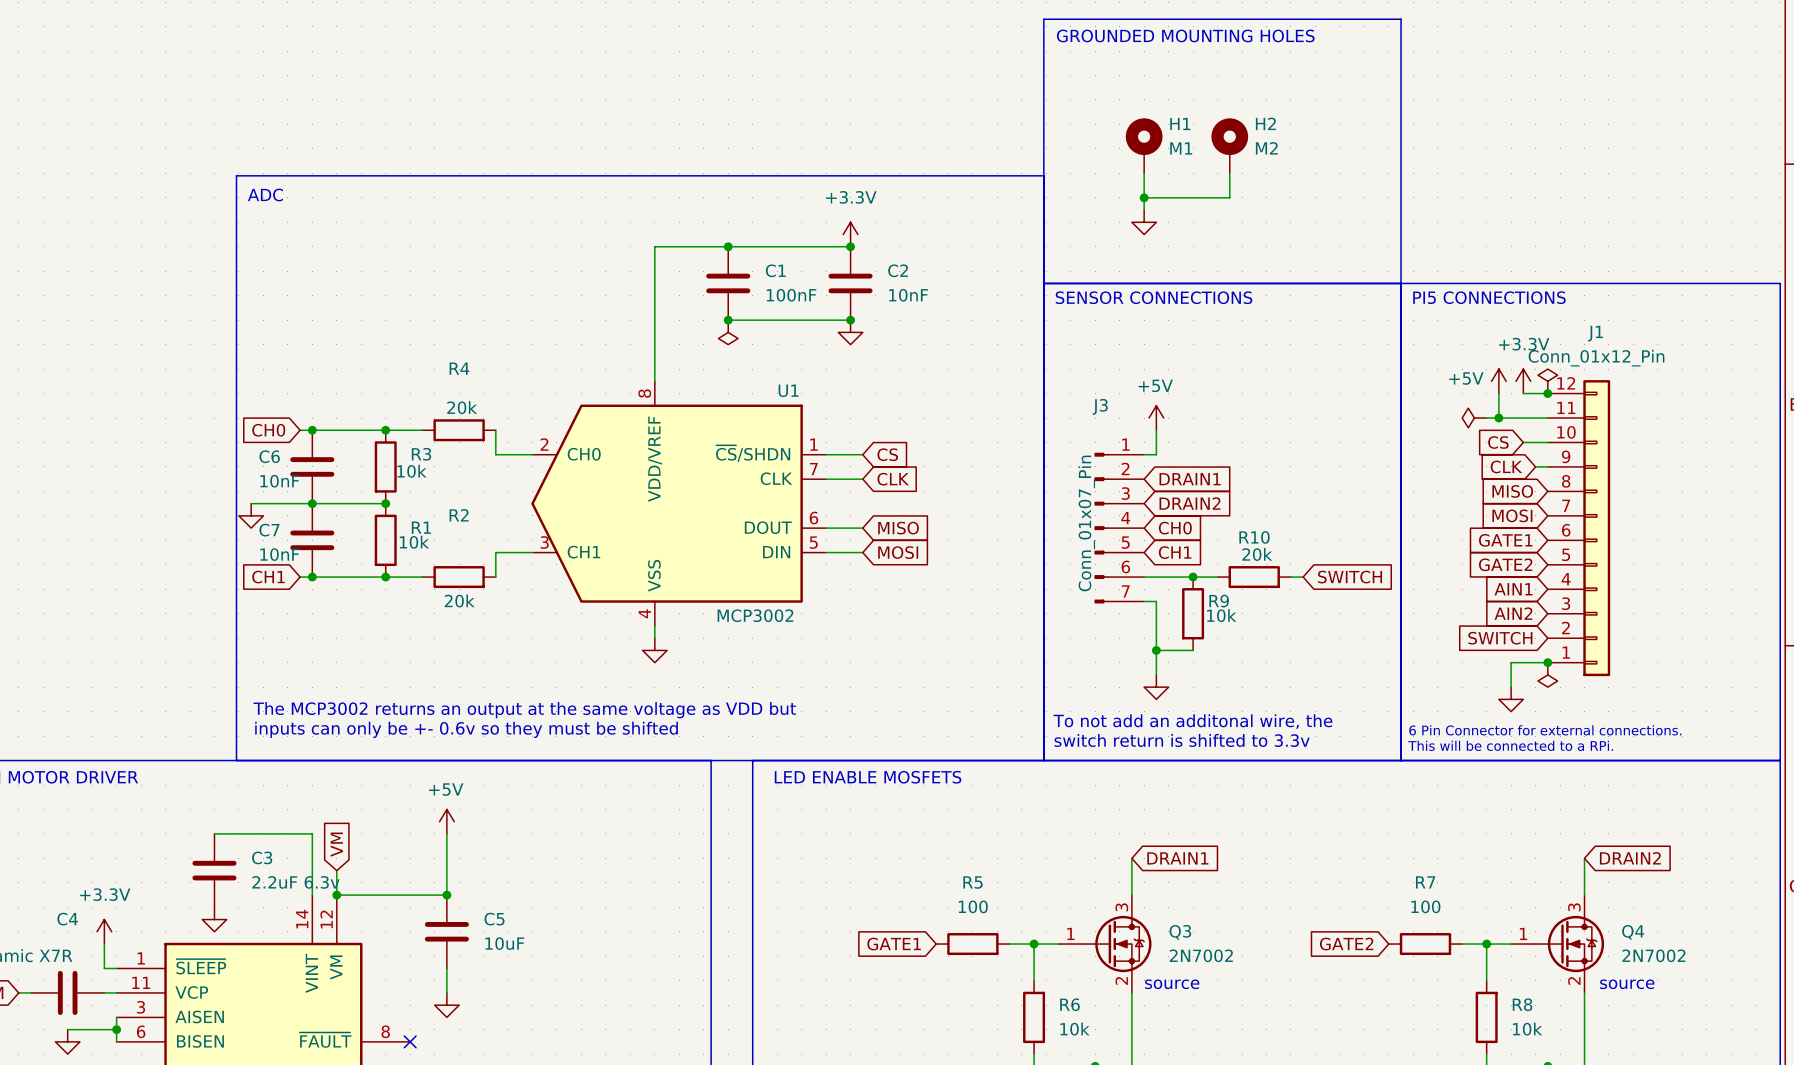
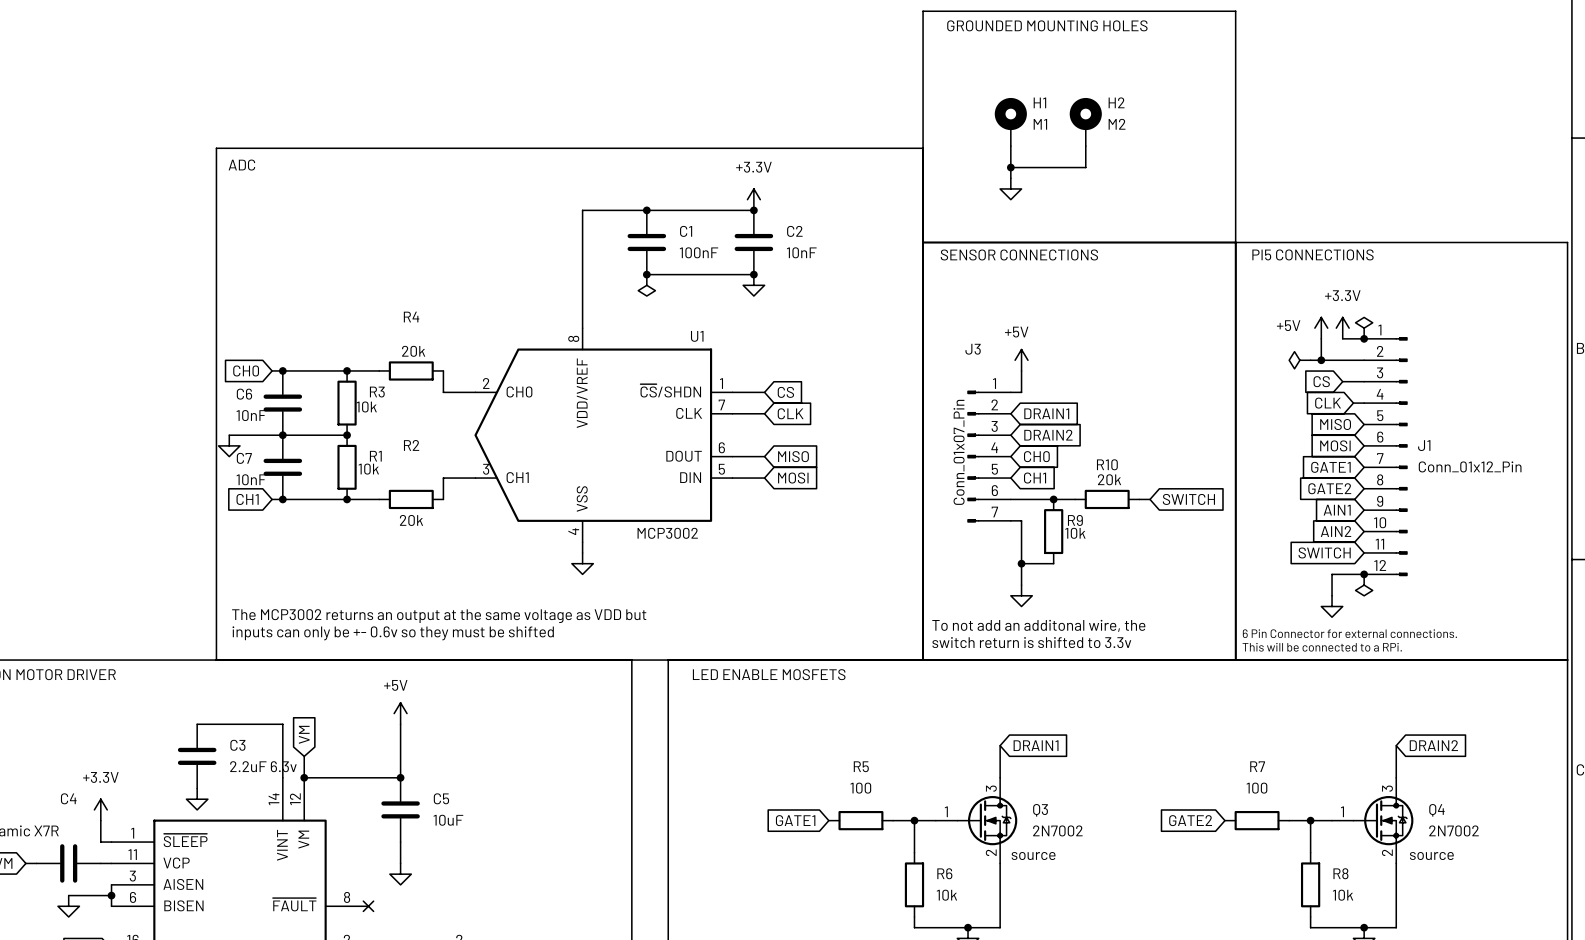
J1 name position: J1 (1595, 333) -> J1 (1424, 445)
J1 value position: Conn_01x12_Pin (1596, 358) -> Conn_01x12_Pin (1470, 466)
J1 symbol: [1547, 380, 1611, 677] -> [1364, 337, 1408, 577]

